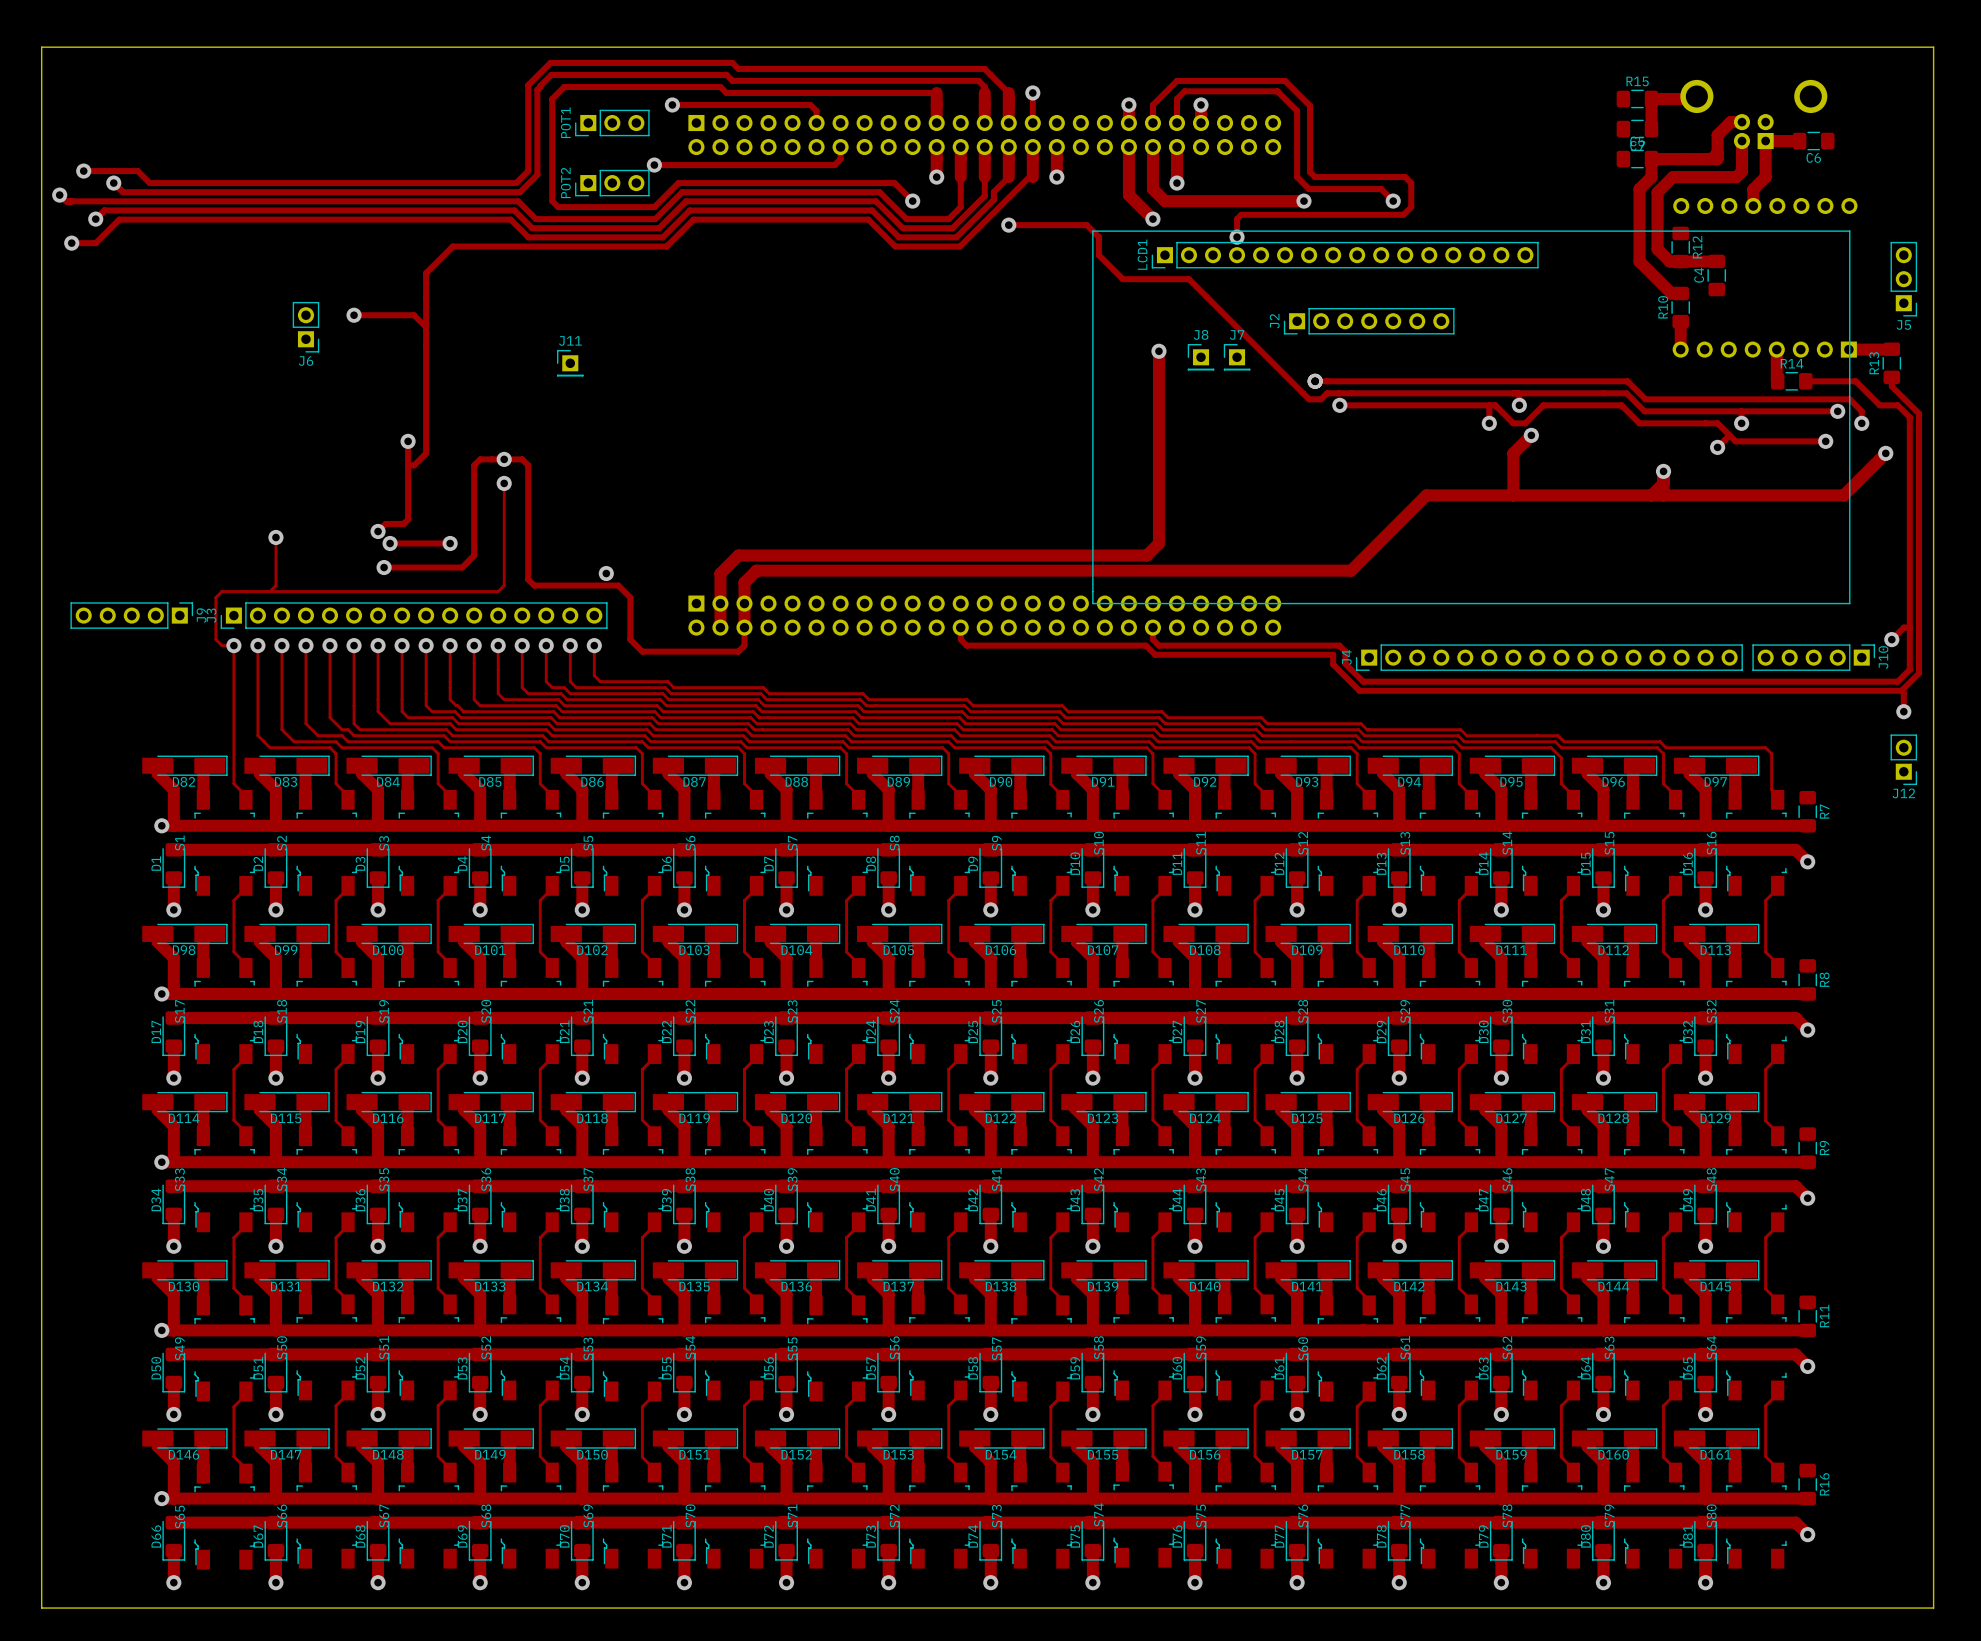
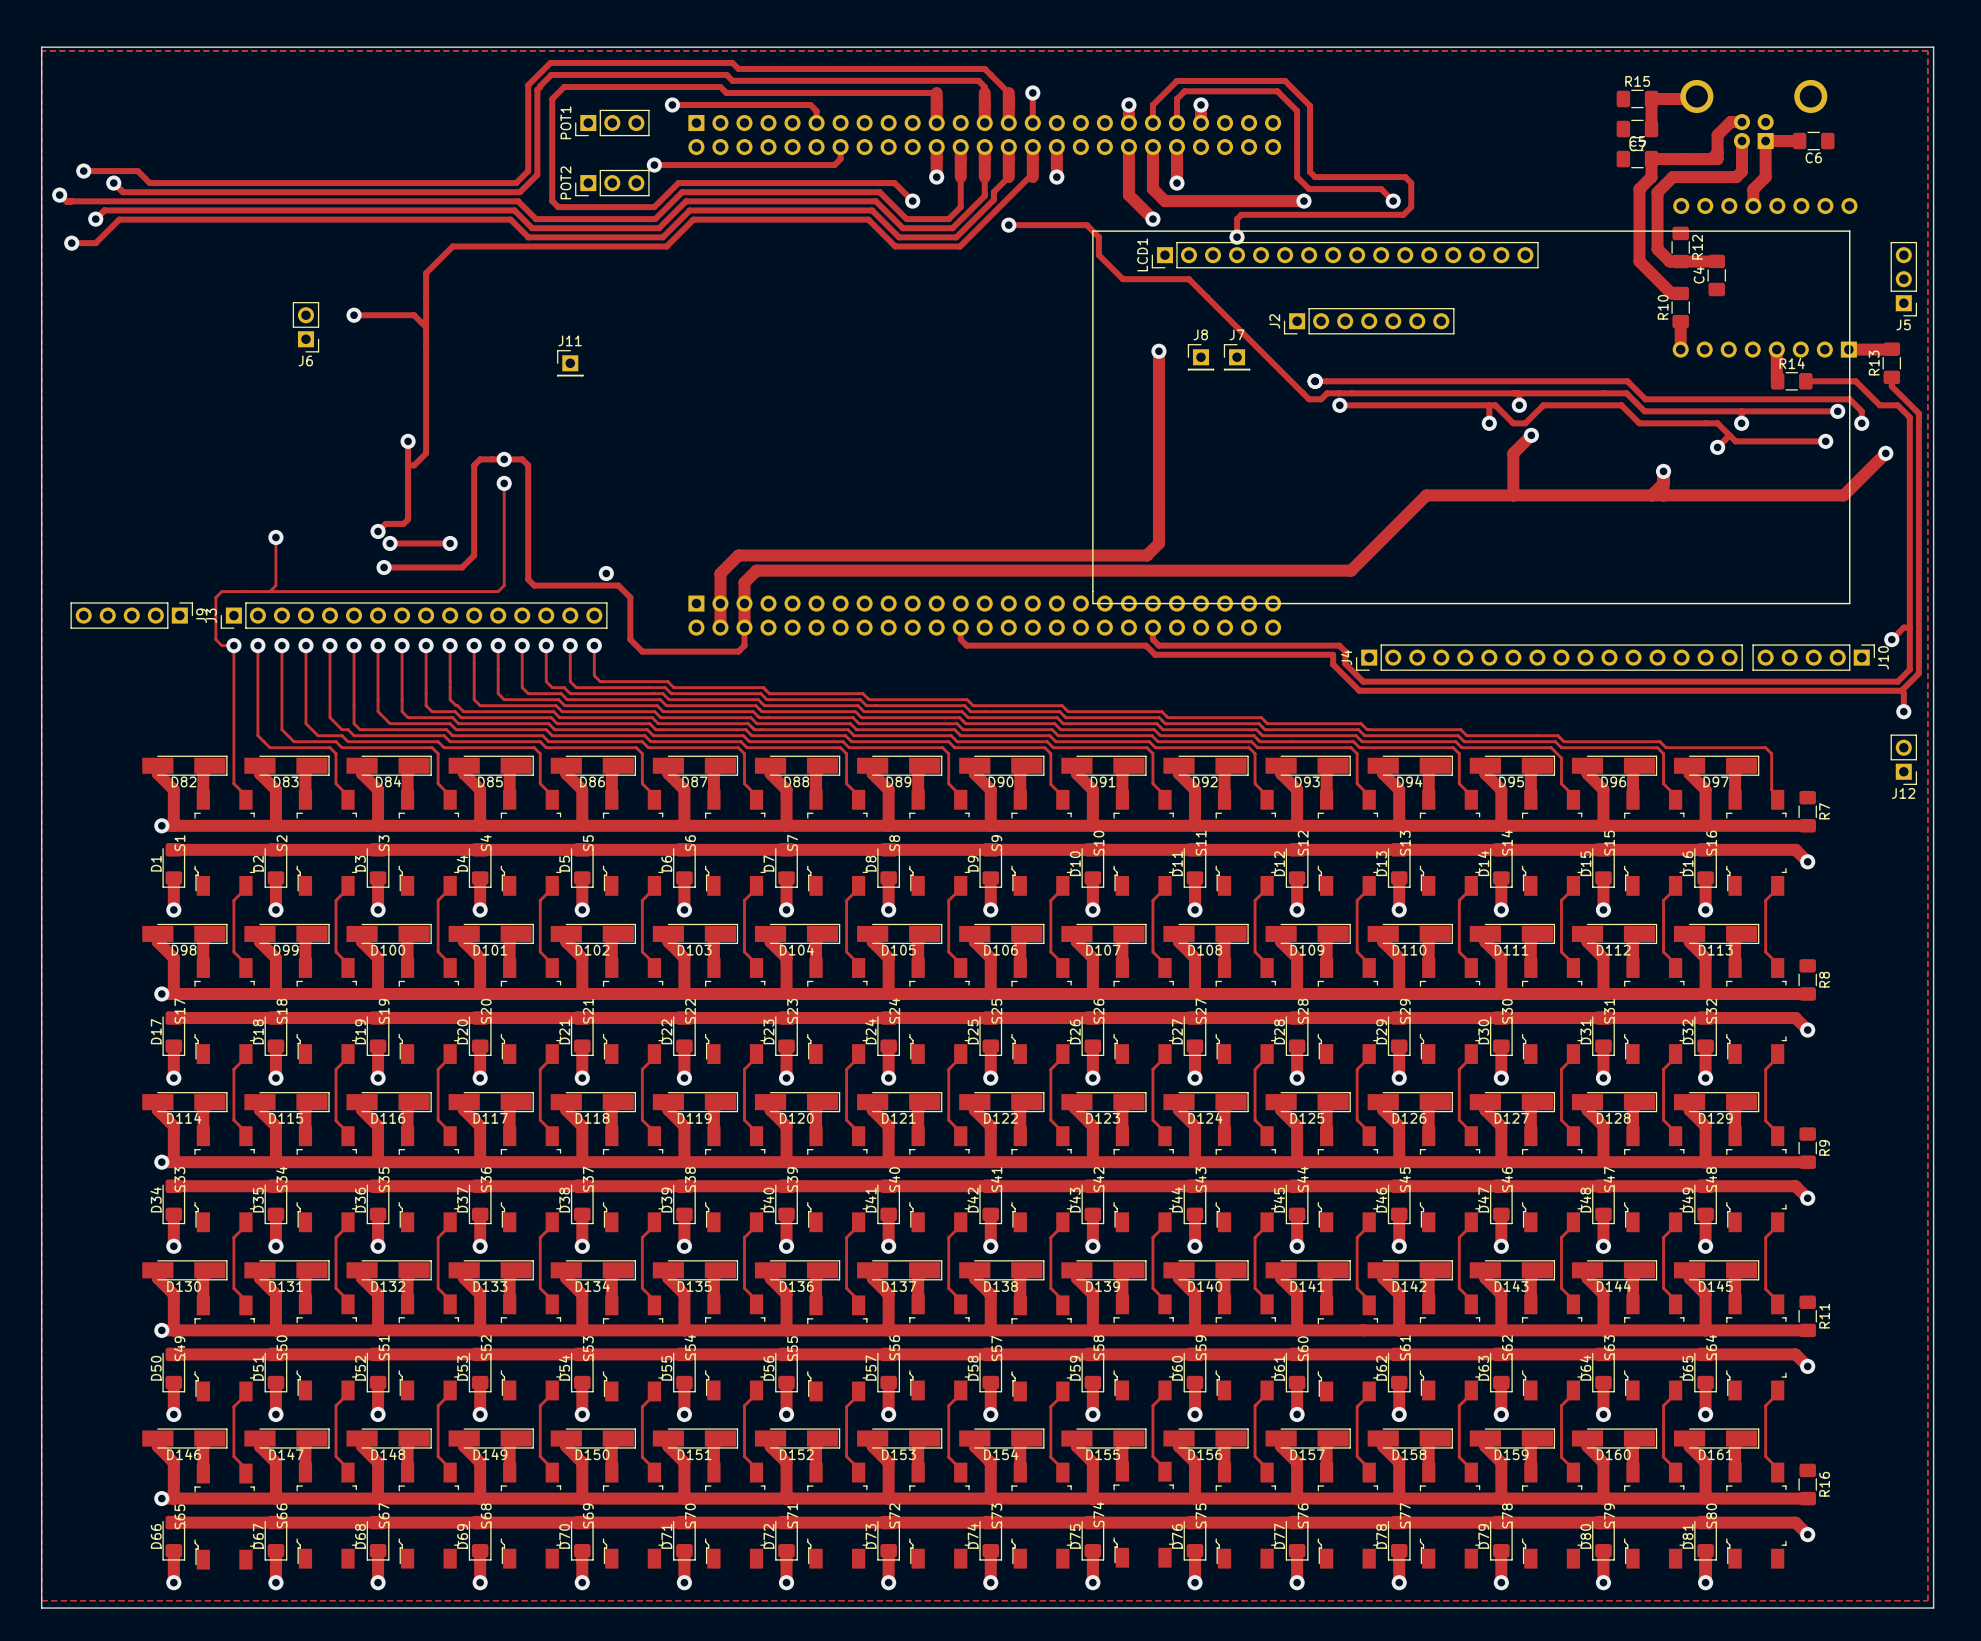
zone outline: none -> (41, 50) (41, 1600) (1927, 1600) (1927, 50) (41, 50)

